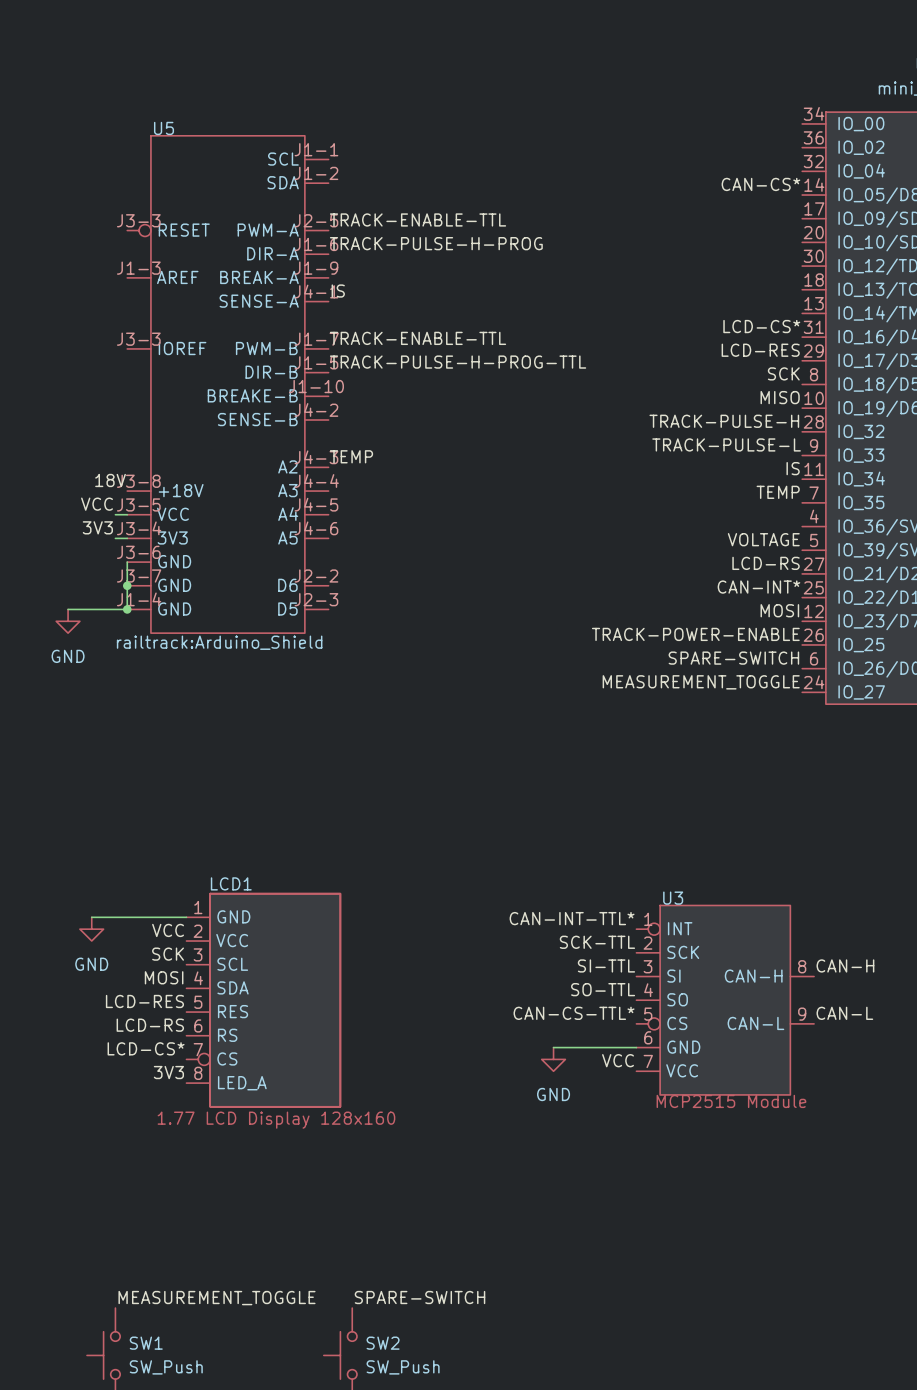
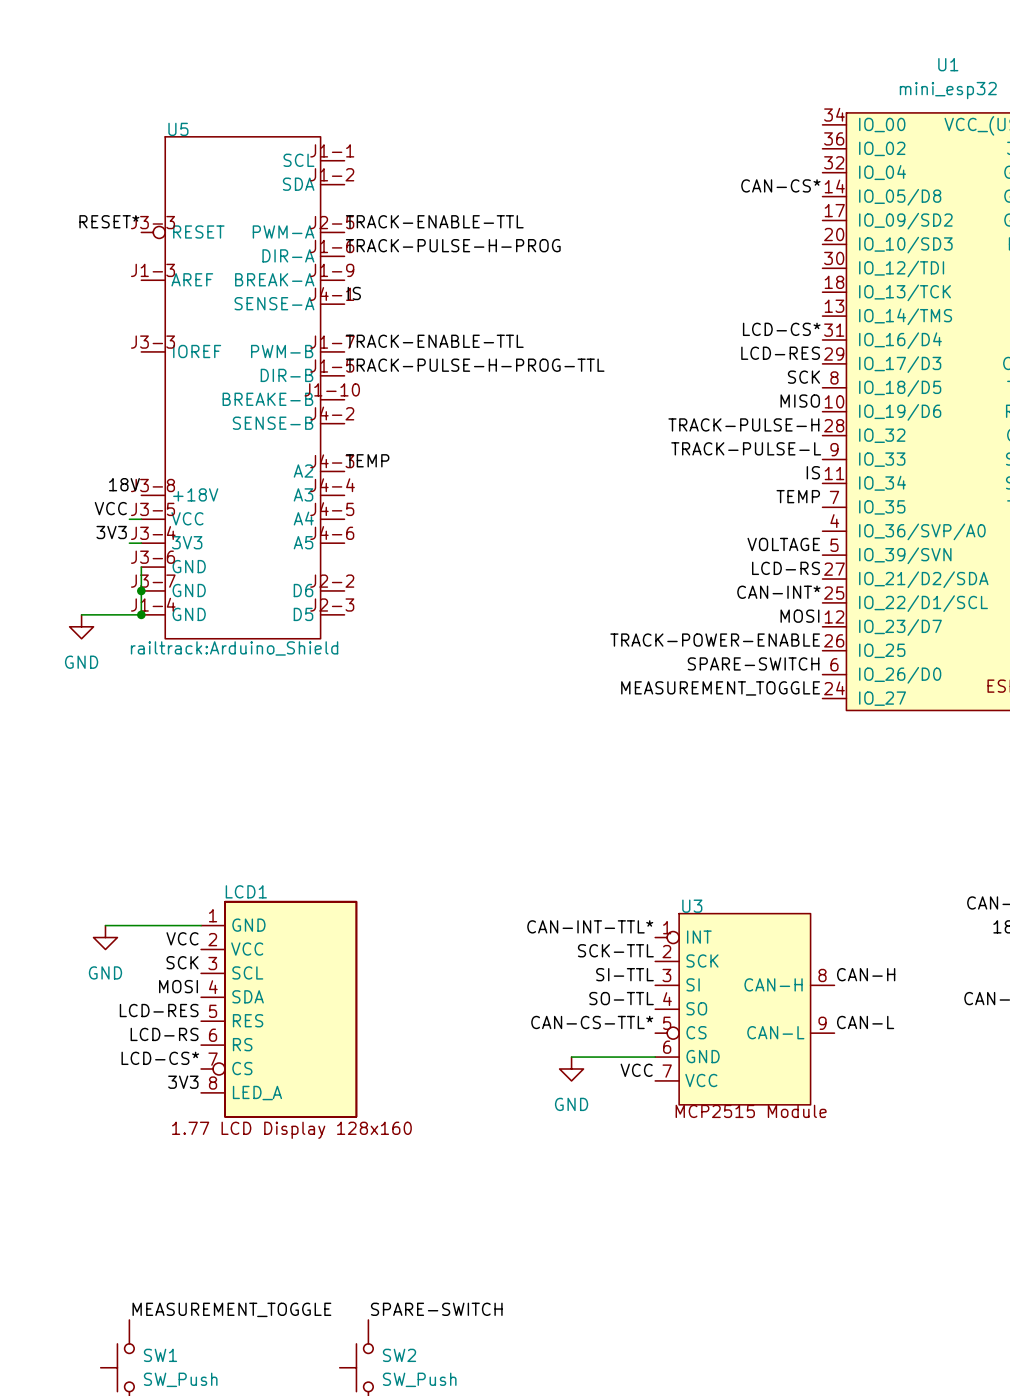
label: none -> RESET* (109, 221)

